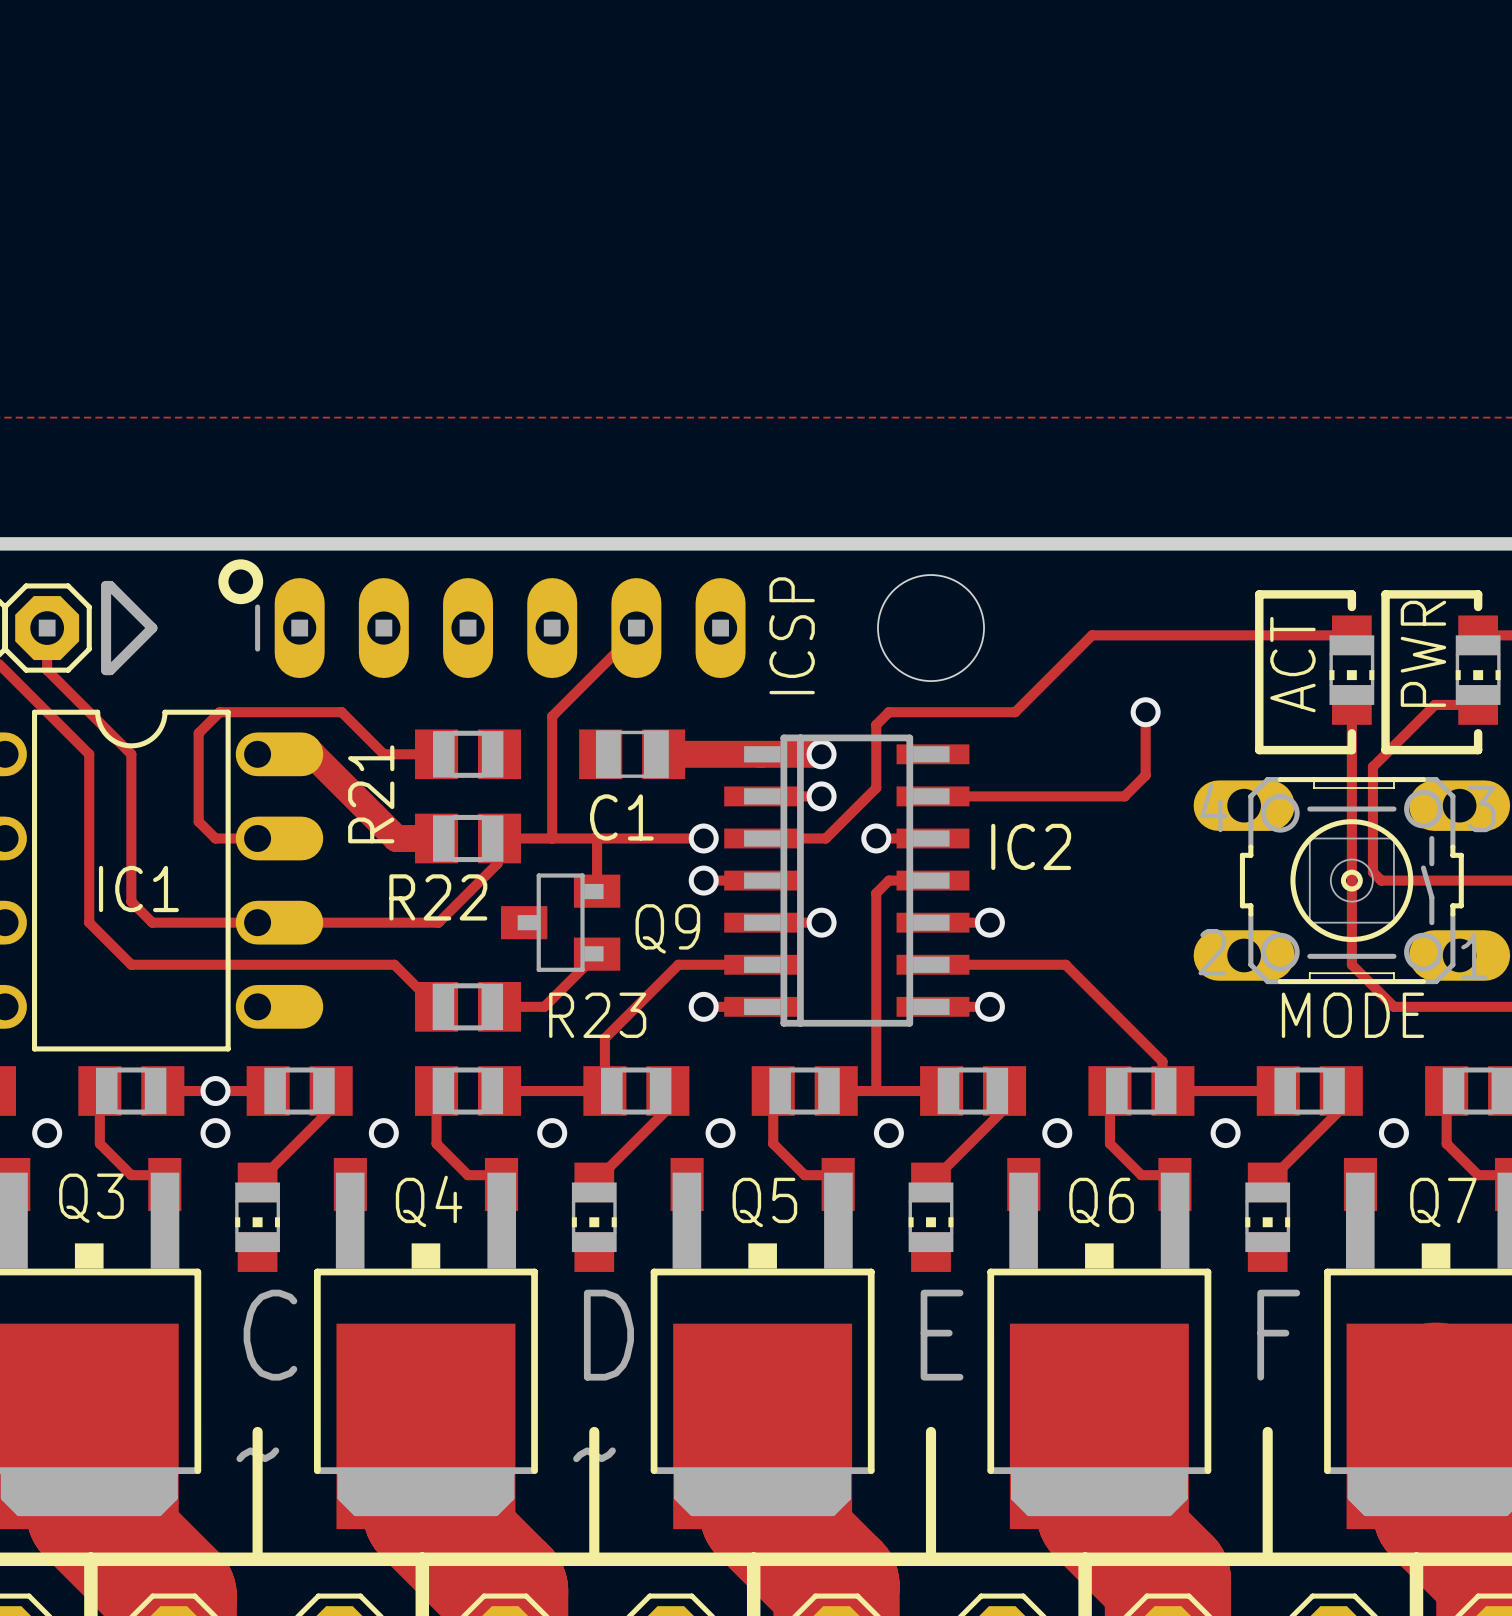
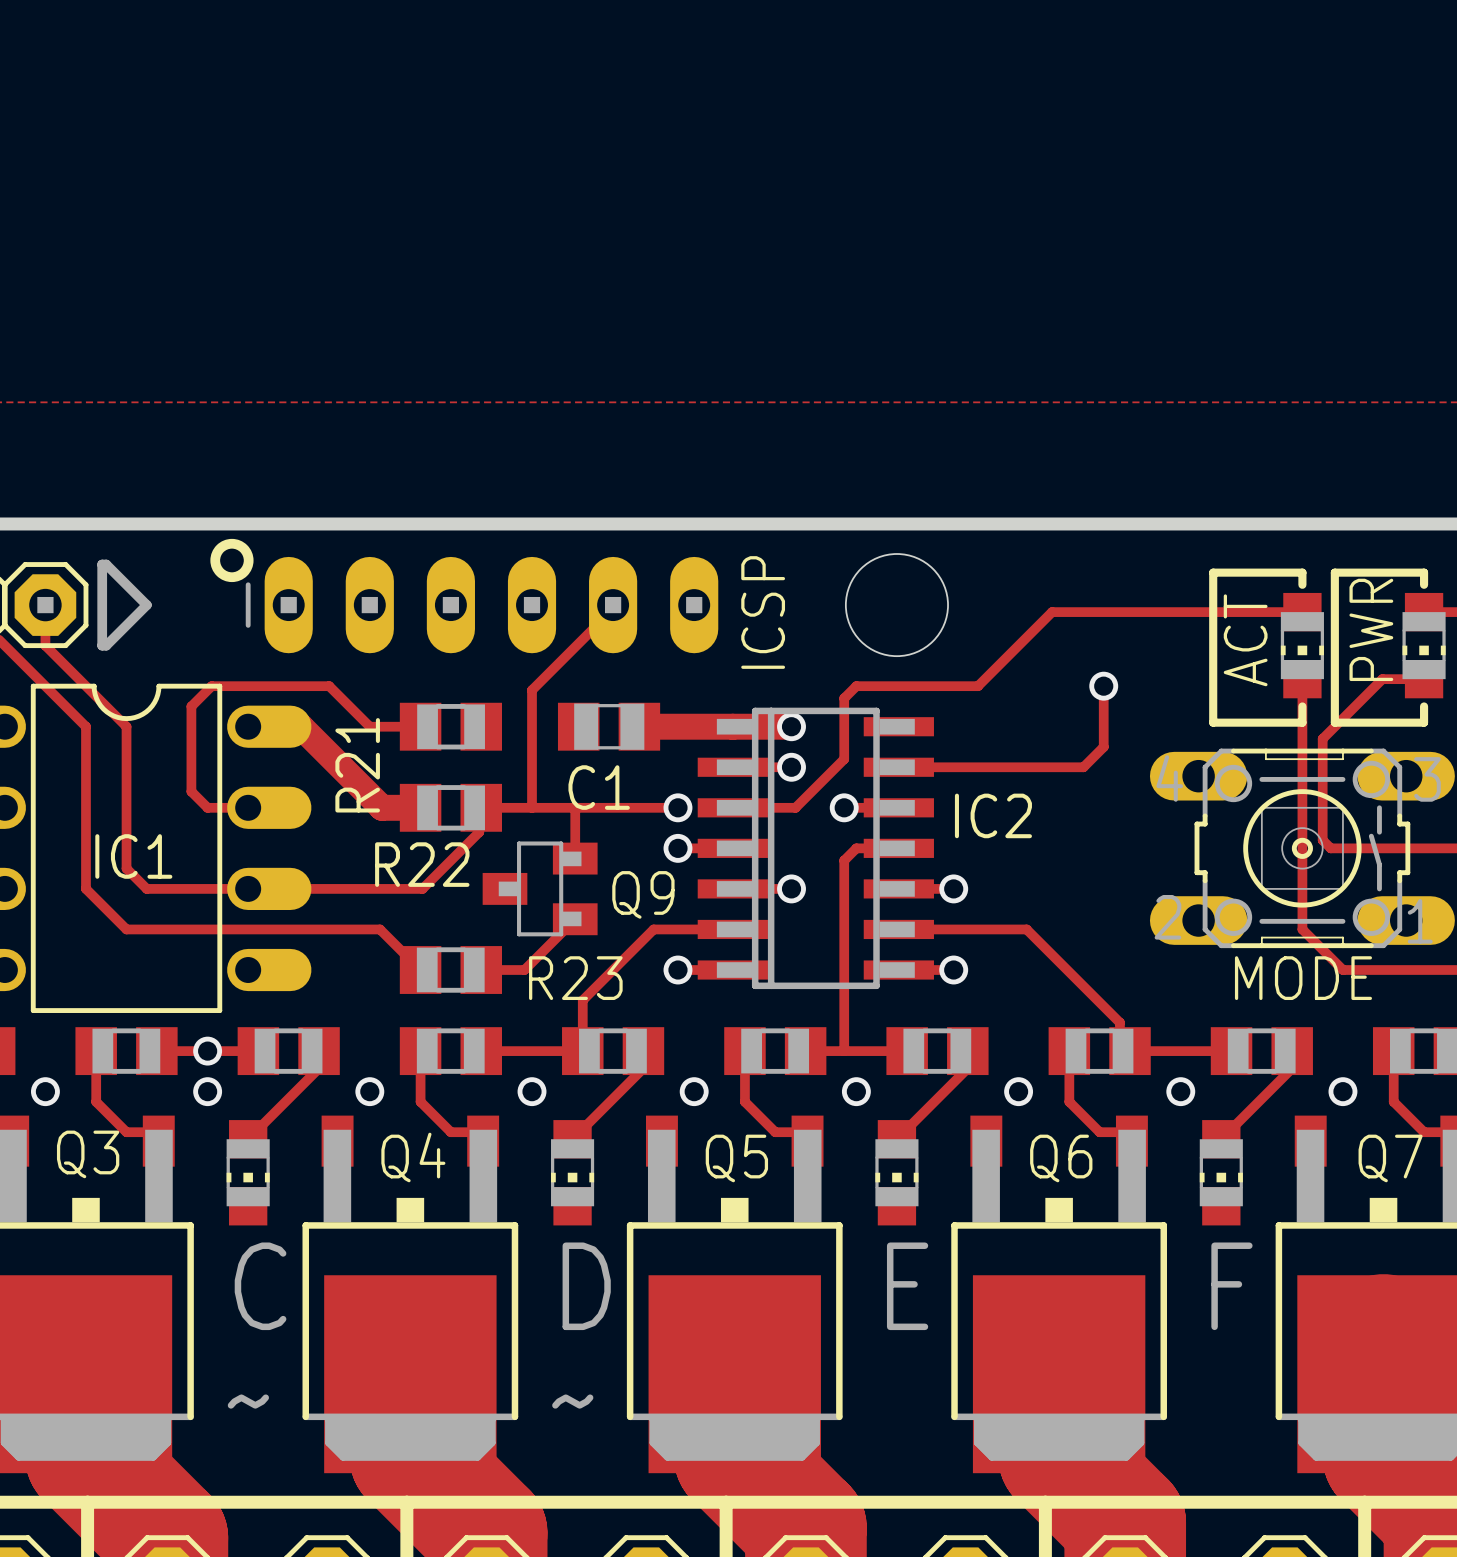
line: (257, 1431) (257, 1558) -> none
line: (594, 1431) (594, 1558) -> none
line: (931, 1431) (931, 1558) -> none
line: (1267, 1431) (1267, 1558) -> none

